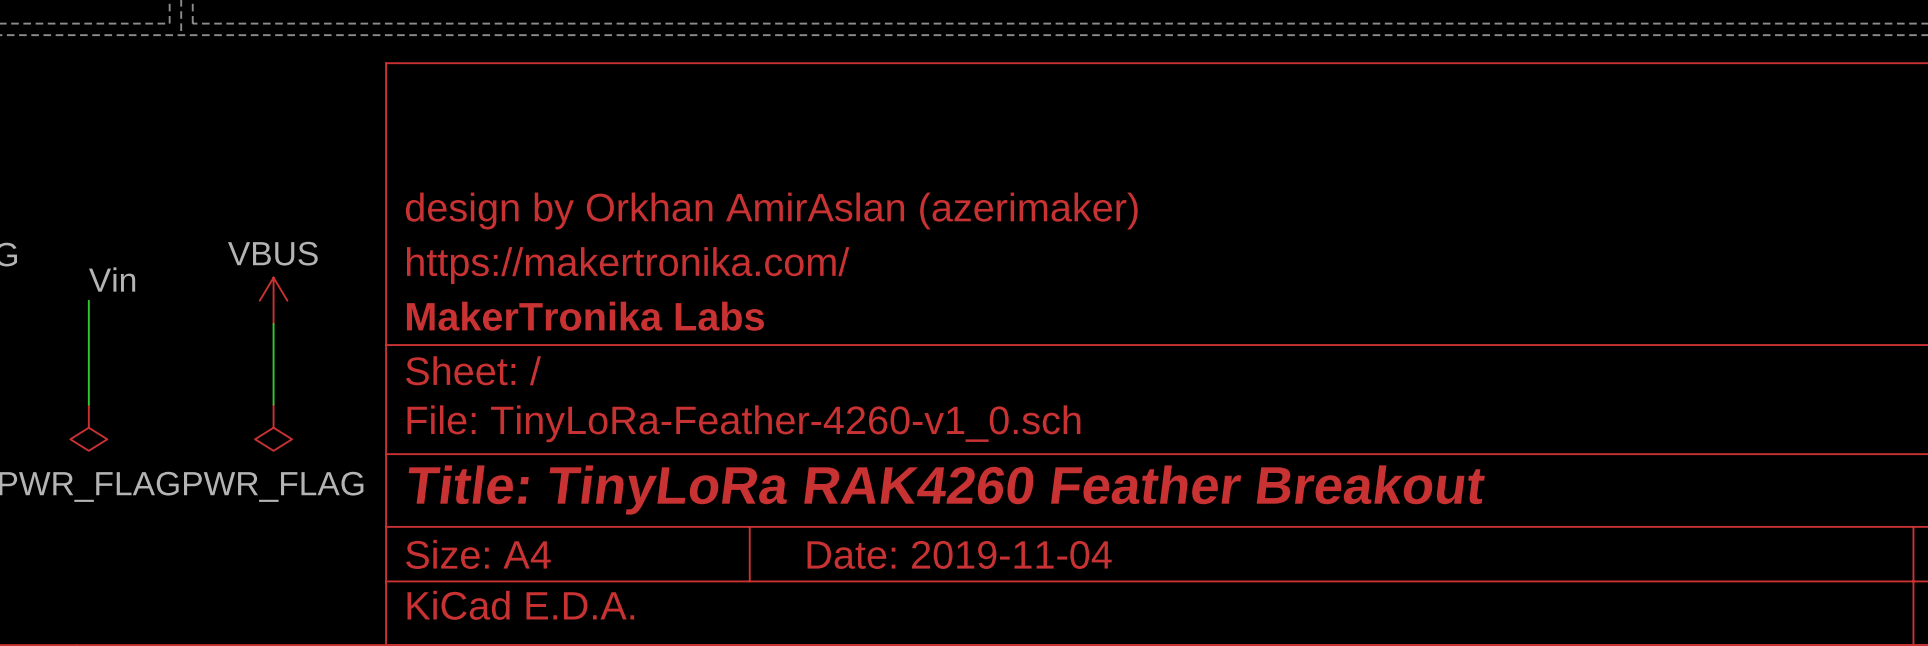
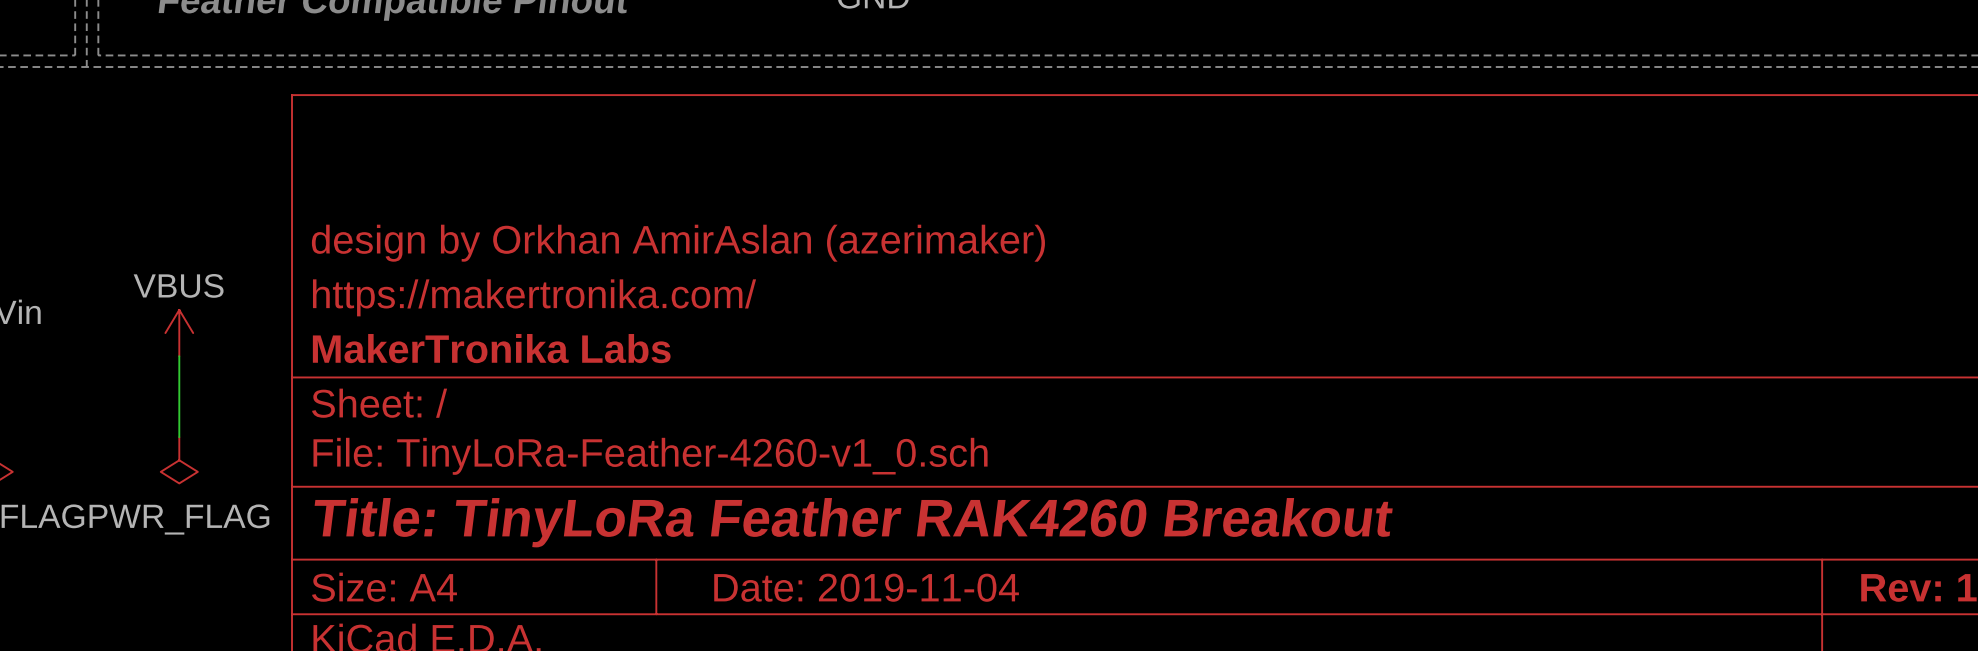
title block: Title: TinyLoRa RAK4260 Feather Breakout (946, 490) -> Title: TinyLoRa Feather RAK4260 Breakout (853, 522)

